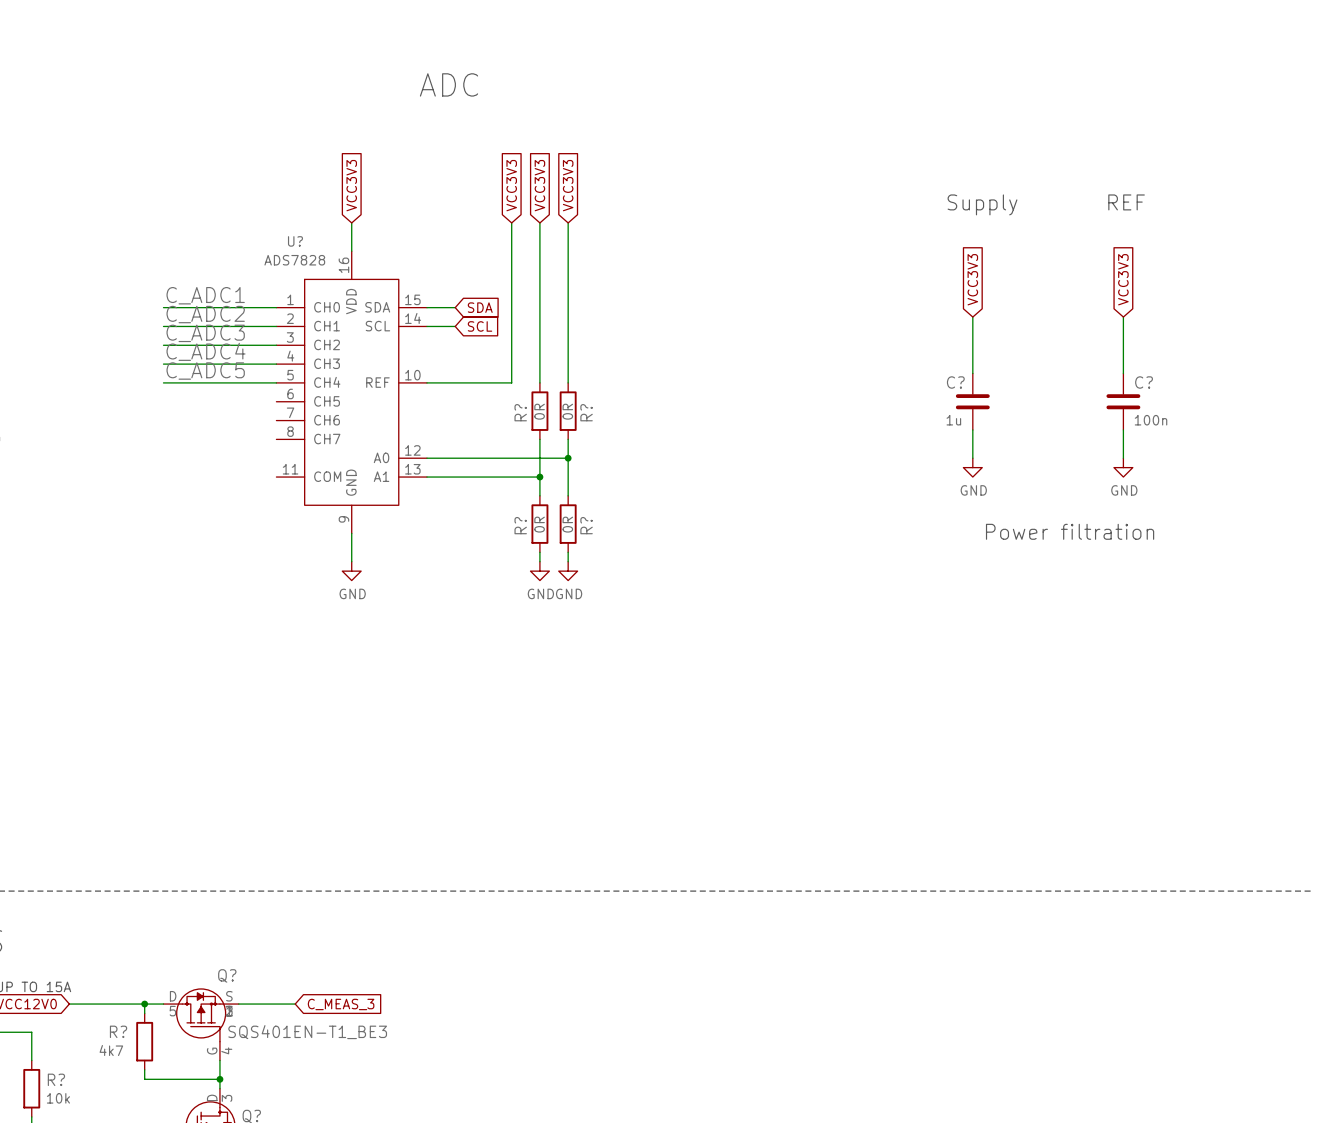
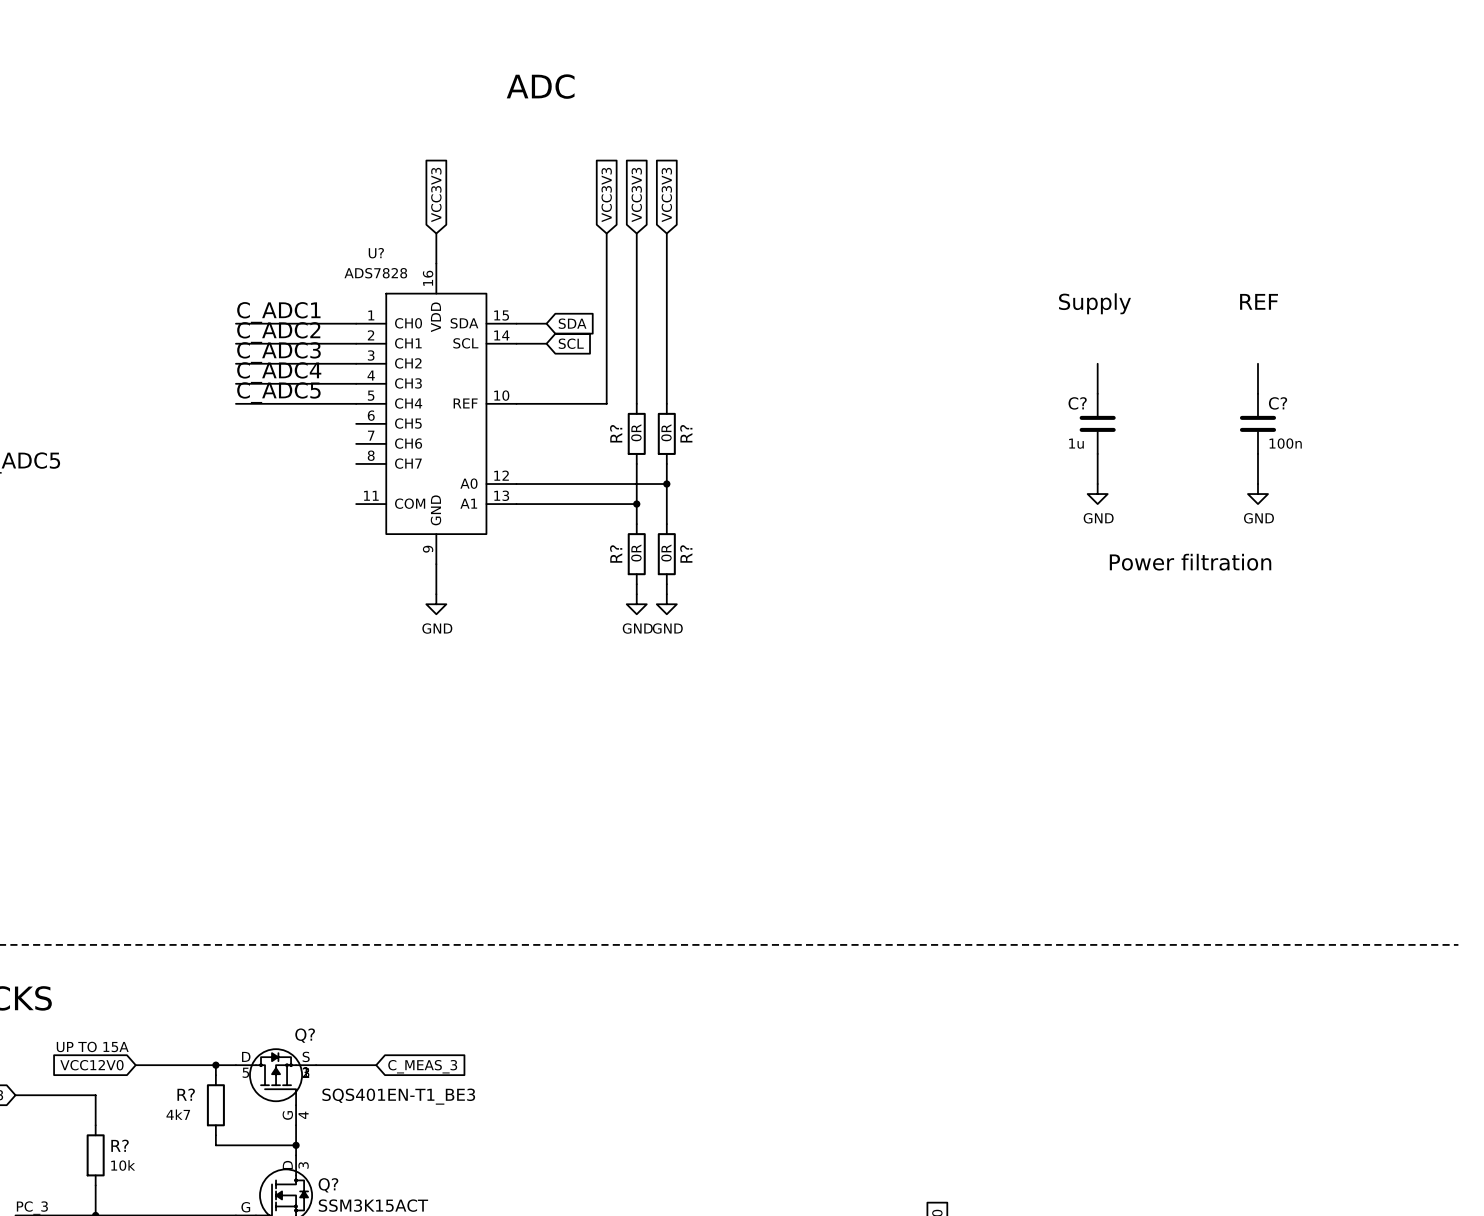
text position: REF (1126, 202) -> REF (1259, 301)
text position: Supply (982, 204) -> Supply (1094, 303)
global label: VCC3V3 (972, 279) -> none
global label: VCC3V3 (1123, 279) -> none
wire: (972, 317) (972, 345) -> none
wire: (1123, 317) (1123, 345) -> none

